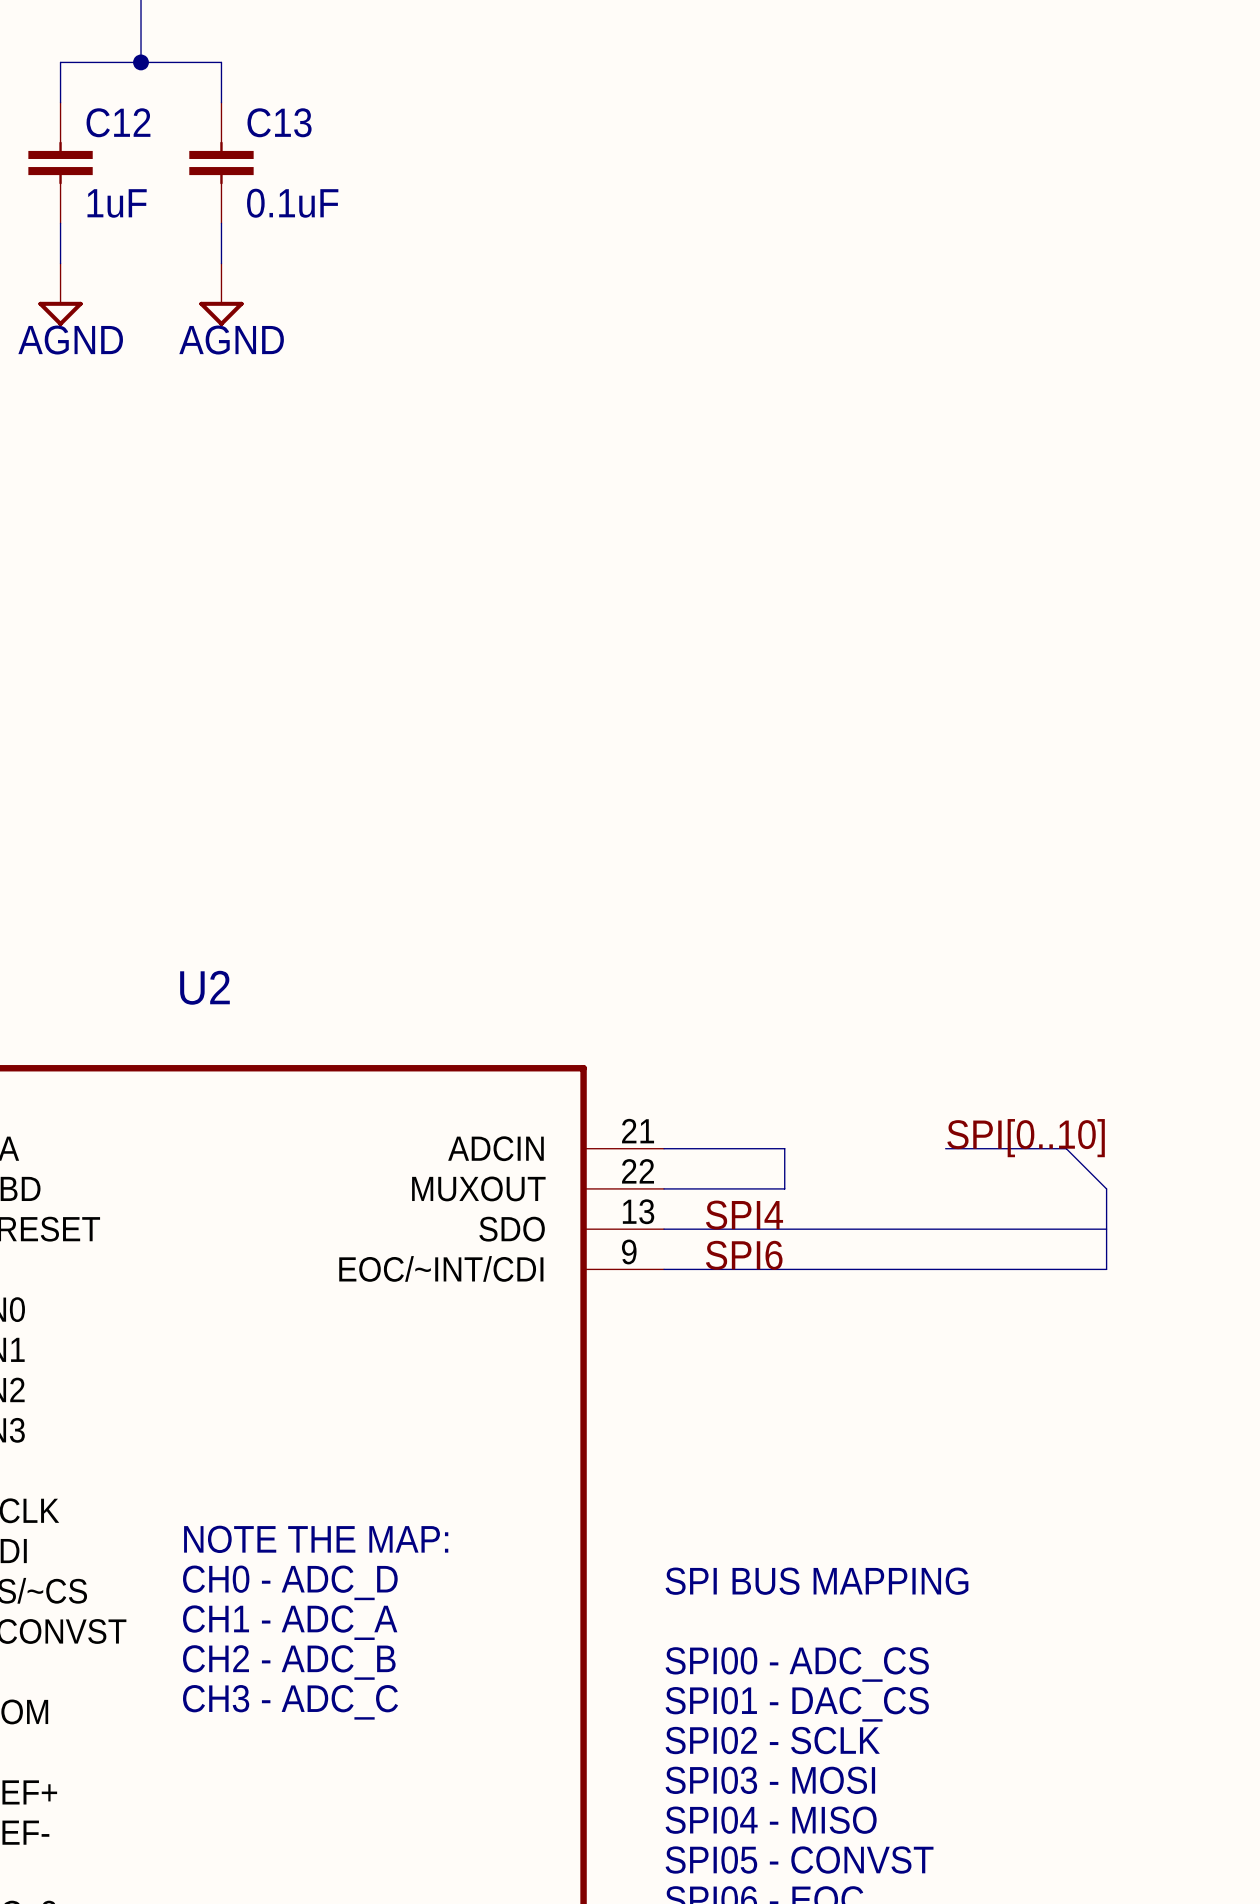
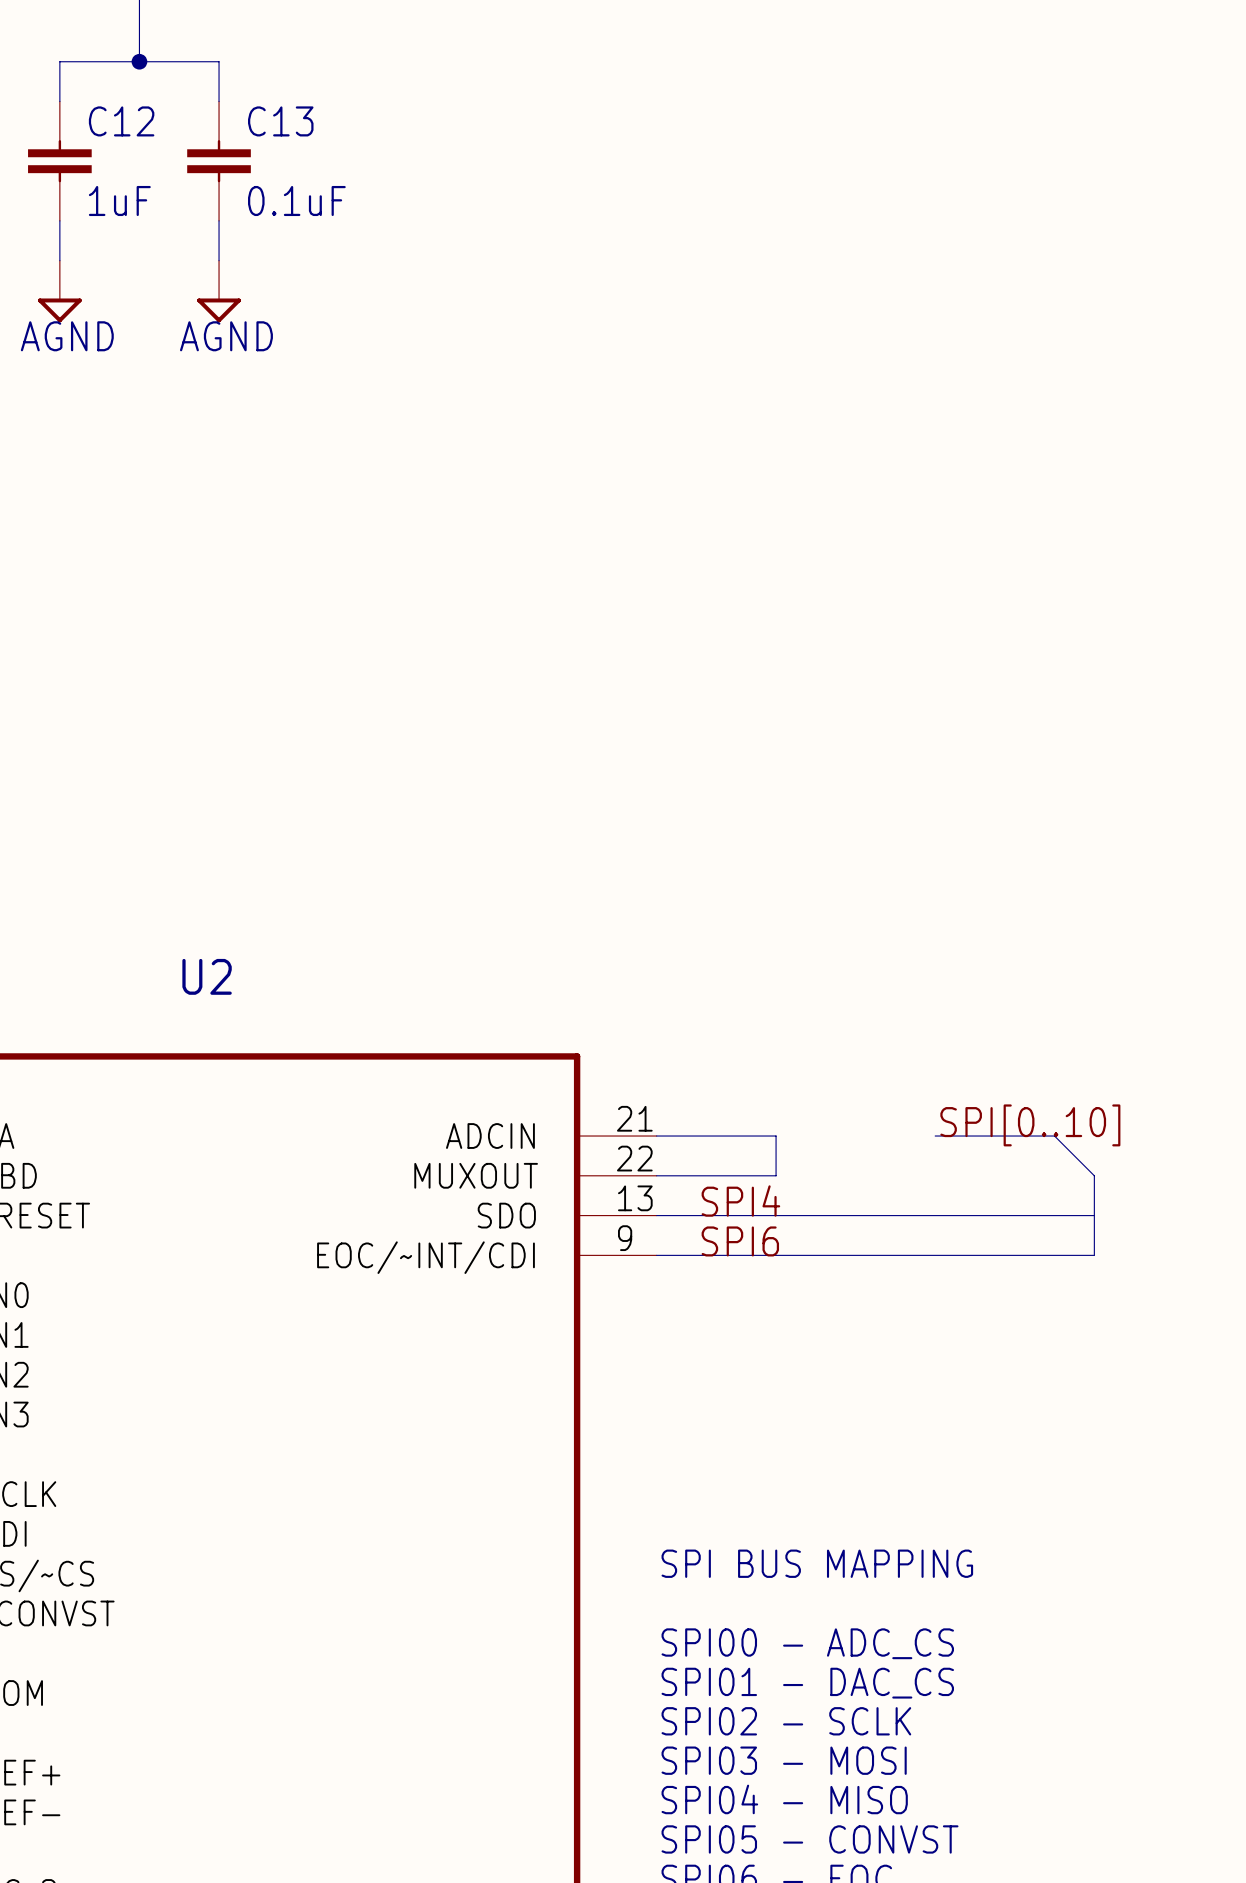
text: NOTE THE MAP: (316, 1539) -> none
text: CH0 - ADC_D (290, 1582) -> none
text: CH1 - ADC_A (290, 1622) -> none
text: CH2 - ADC_B (289, 1662) -> none
text: CH3 - ADC_C (290, 1702) -> none

